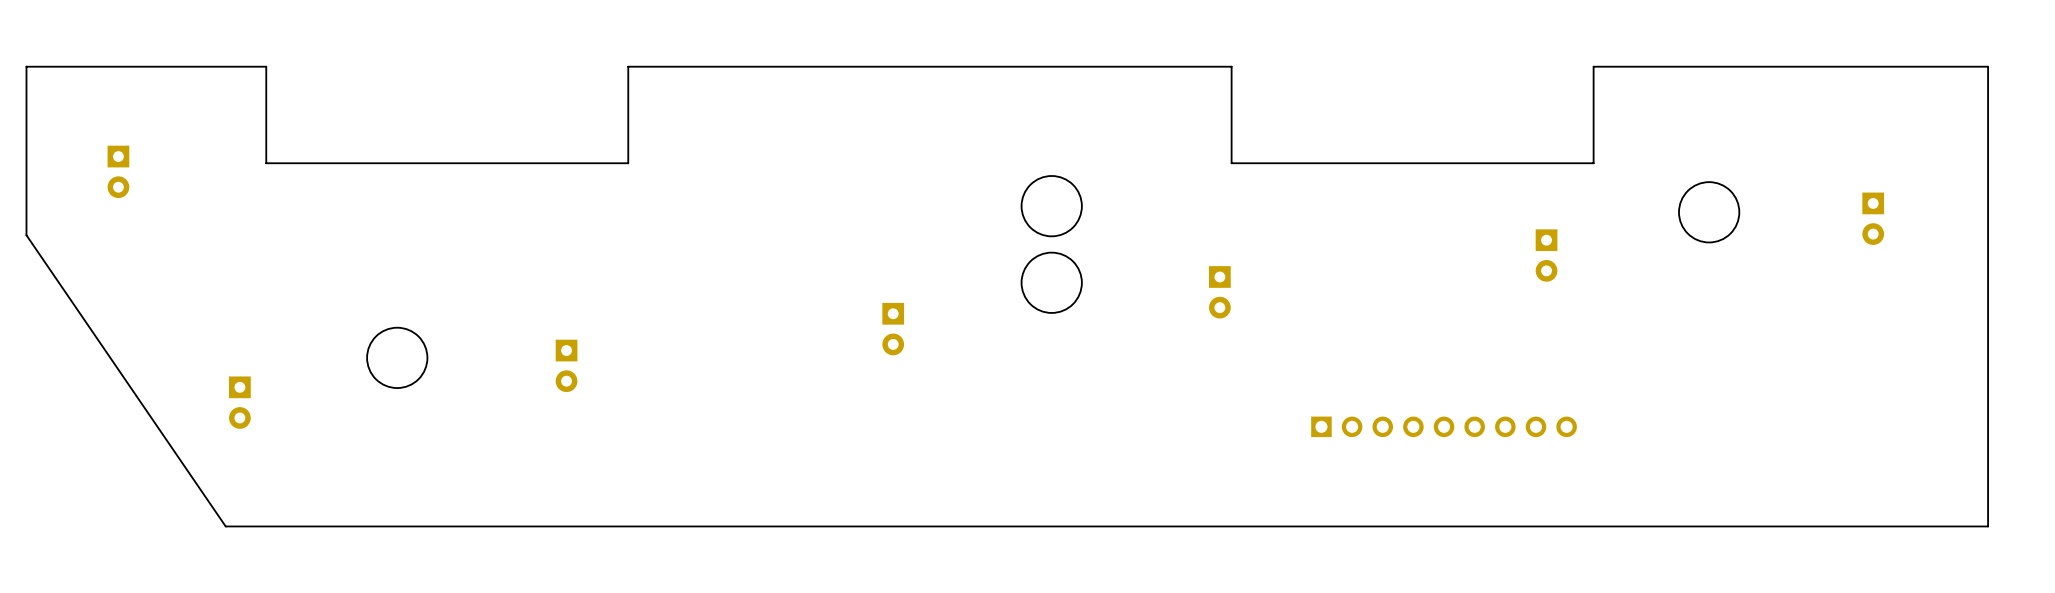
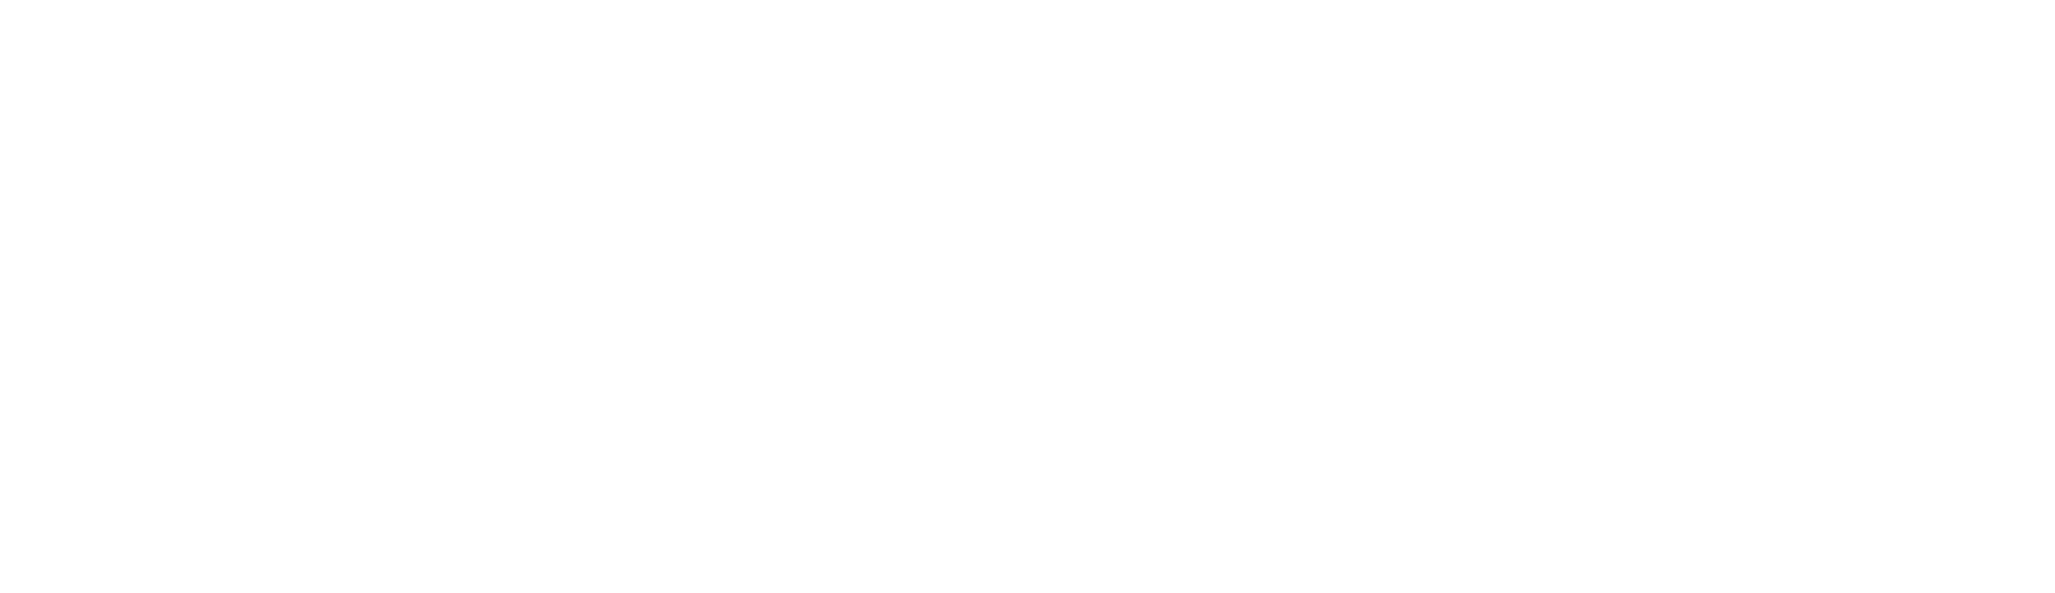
board edge: (26, 66) (266, 66) (266, 163) (628, 163) (628, 66) (1231, 66) (1231, 163) (1593, 163) (1593, 66) (1988, 66) (1988, 526) (225, 526) (26, 235) (26, 66) -> none
part: (118, 171) -> none
round board edge: [1020, 175, 1083, 238] -> none
round board edge: [1678, 181, 1741, 244] -> none
part: (1873, 218) -> none
round board edge: [1020, 251, 1083, 314] -> none
part: (1546, 255) -> none
part: (1219, 292) -> none
round board edge: [366, 326, 429, 389] -> none
part: (893, 329) -> none
part: (566, 365) -> none
part: (239, 402) -> none
part: (1444, 426) -> none

